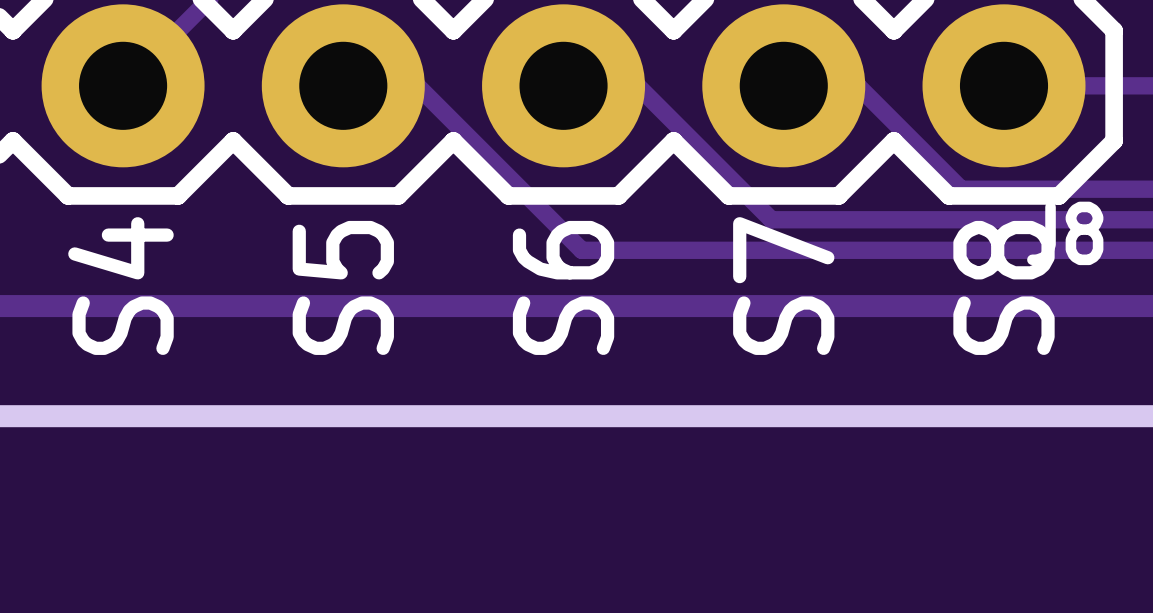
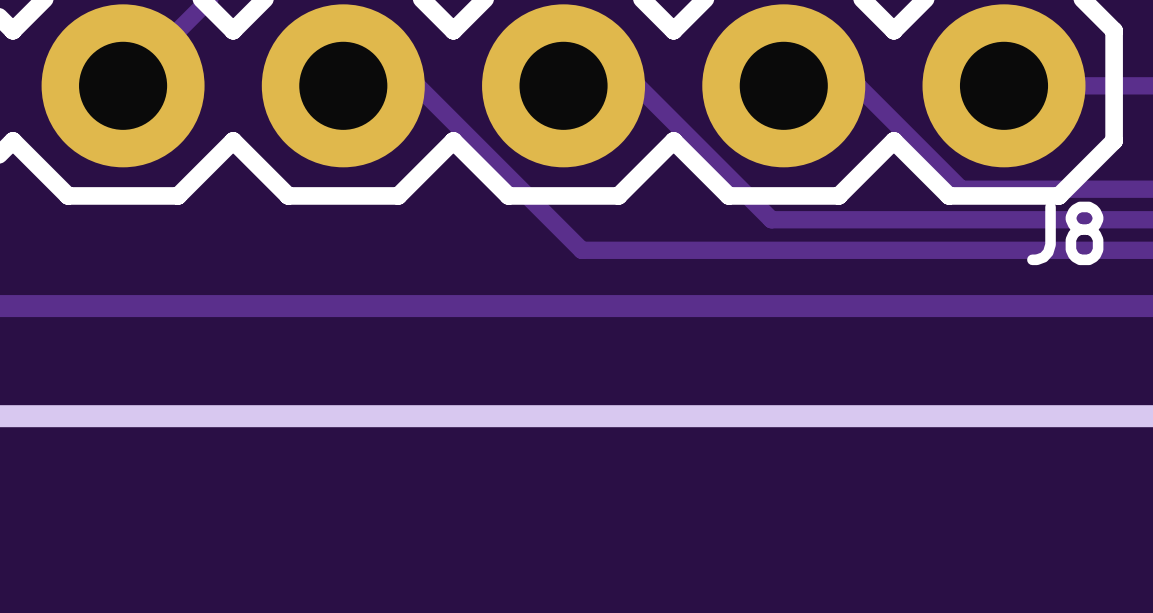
text: S4 (120, 286) -> none
text: S7 (783, 286) -> none
text: S5 (343, 287) -> none
text: S6 (563, 287) -> none
text: S8 (1004, 287) -> none

